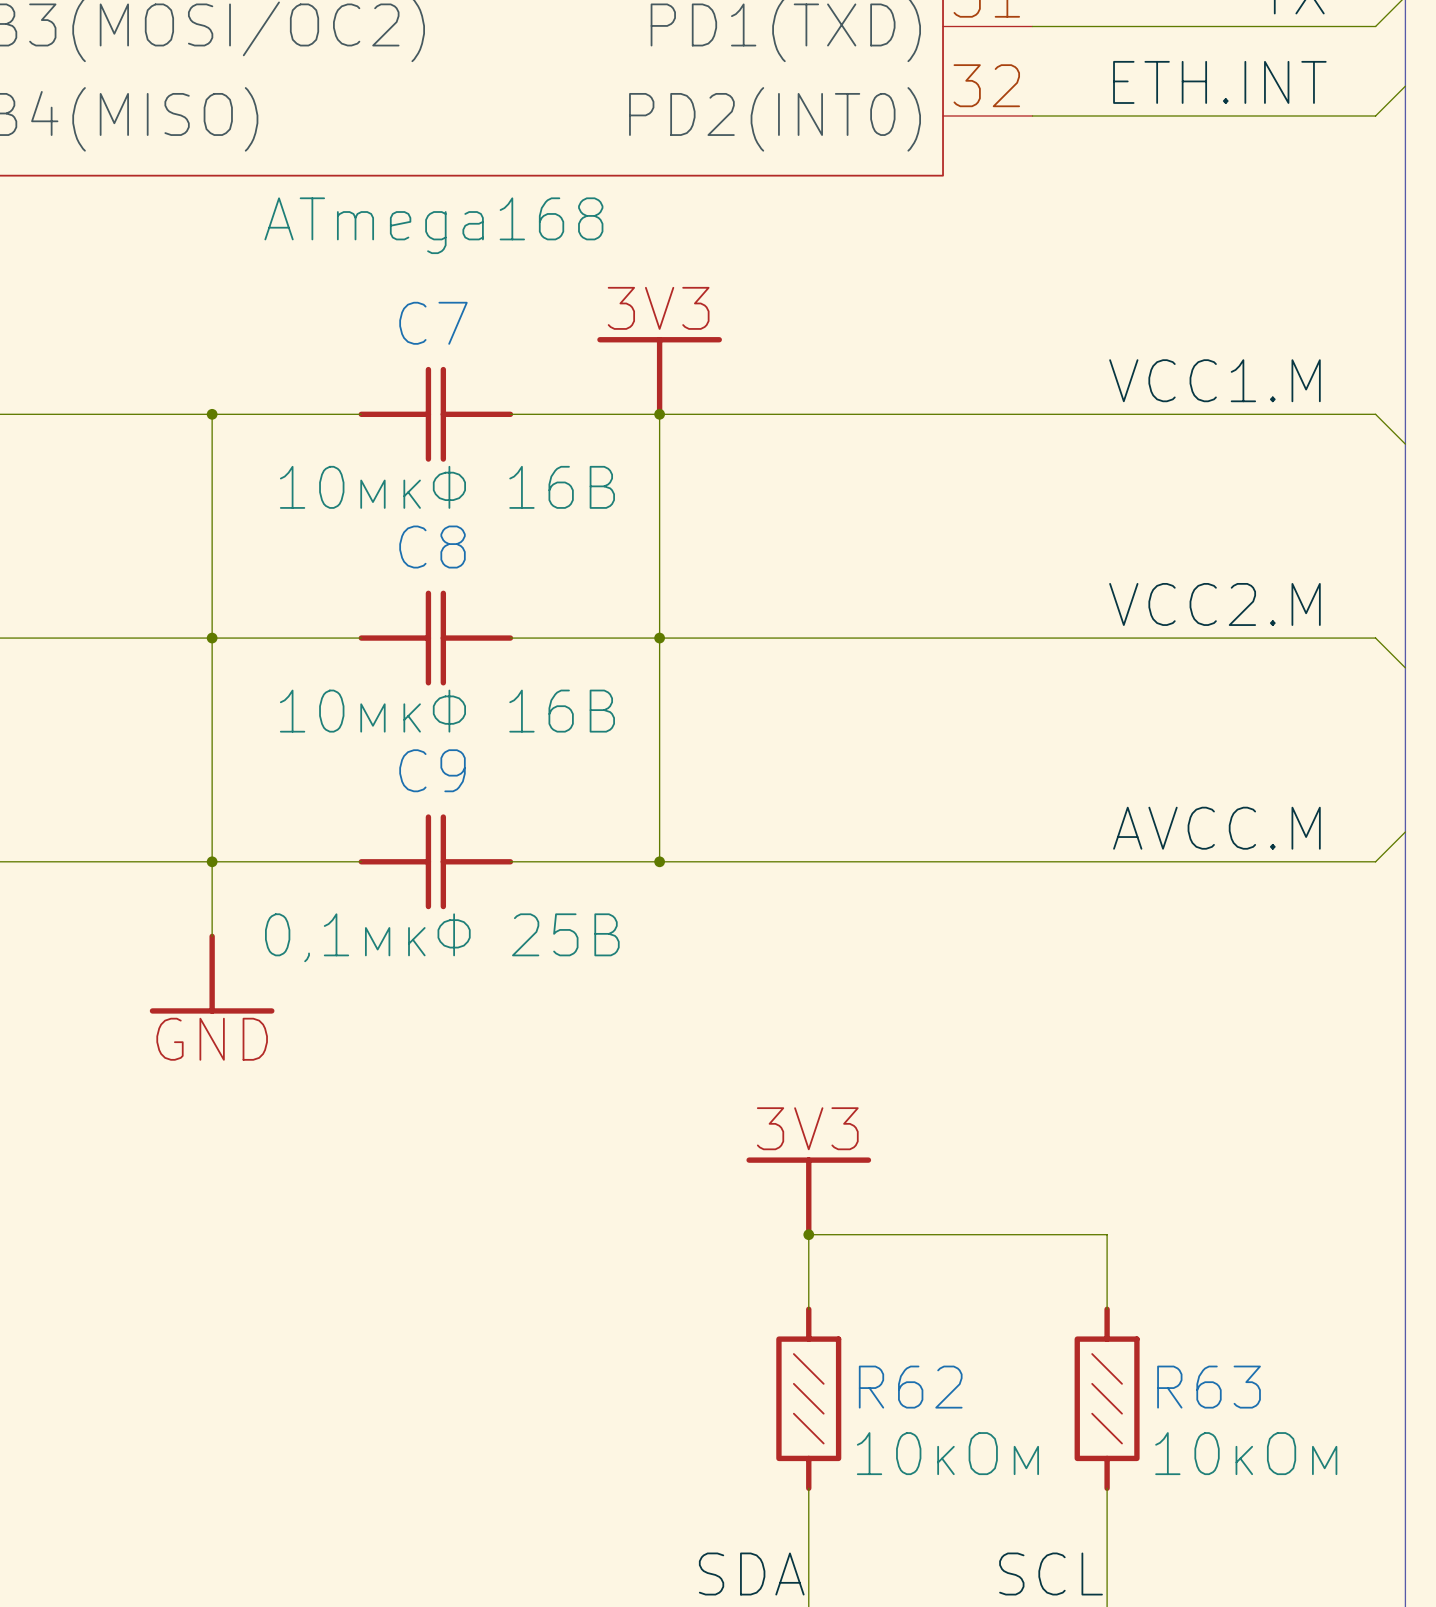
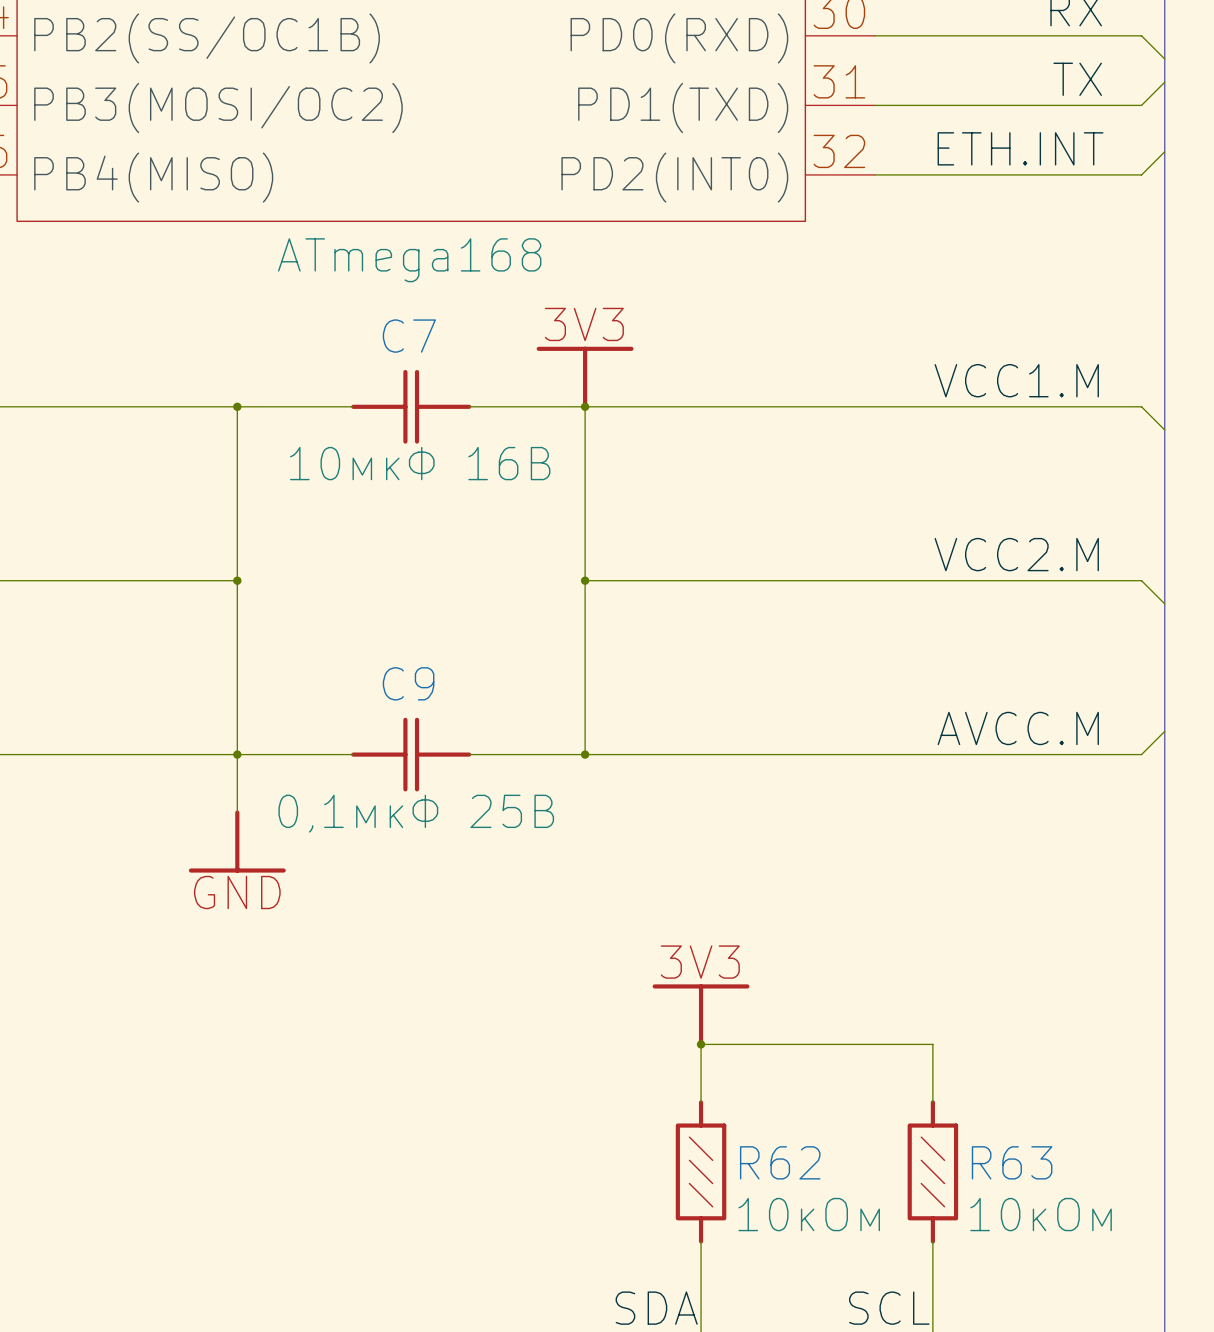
wire: (212, 638) (361, 638) -> none
C8: (435, 638) -> none
wire: (510, 638) (659, 638) -> none

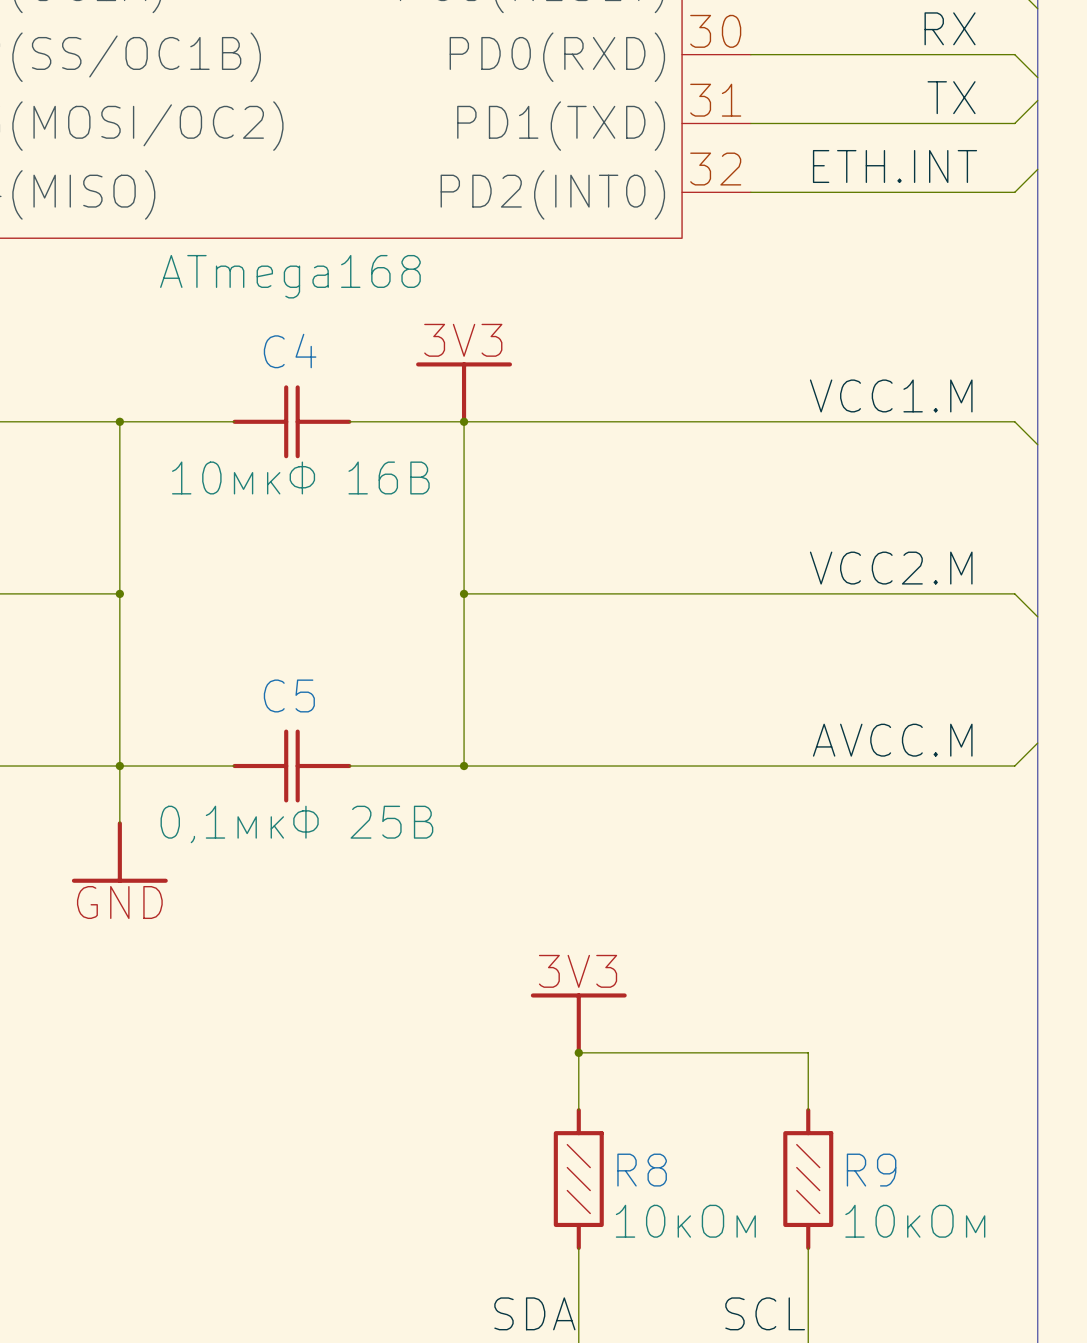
C7 name: C7 (409, 336) -> C4 (290, 351)
C9 name: C9 (408, 683) -> C5 (289, 695)
R62 name: R62 (780, 1162) -> R8 (642, 1170)
R63 name: R63 (1012, 1162) -> R9 (871, 1170)

